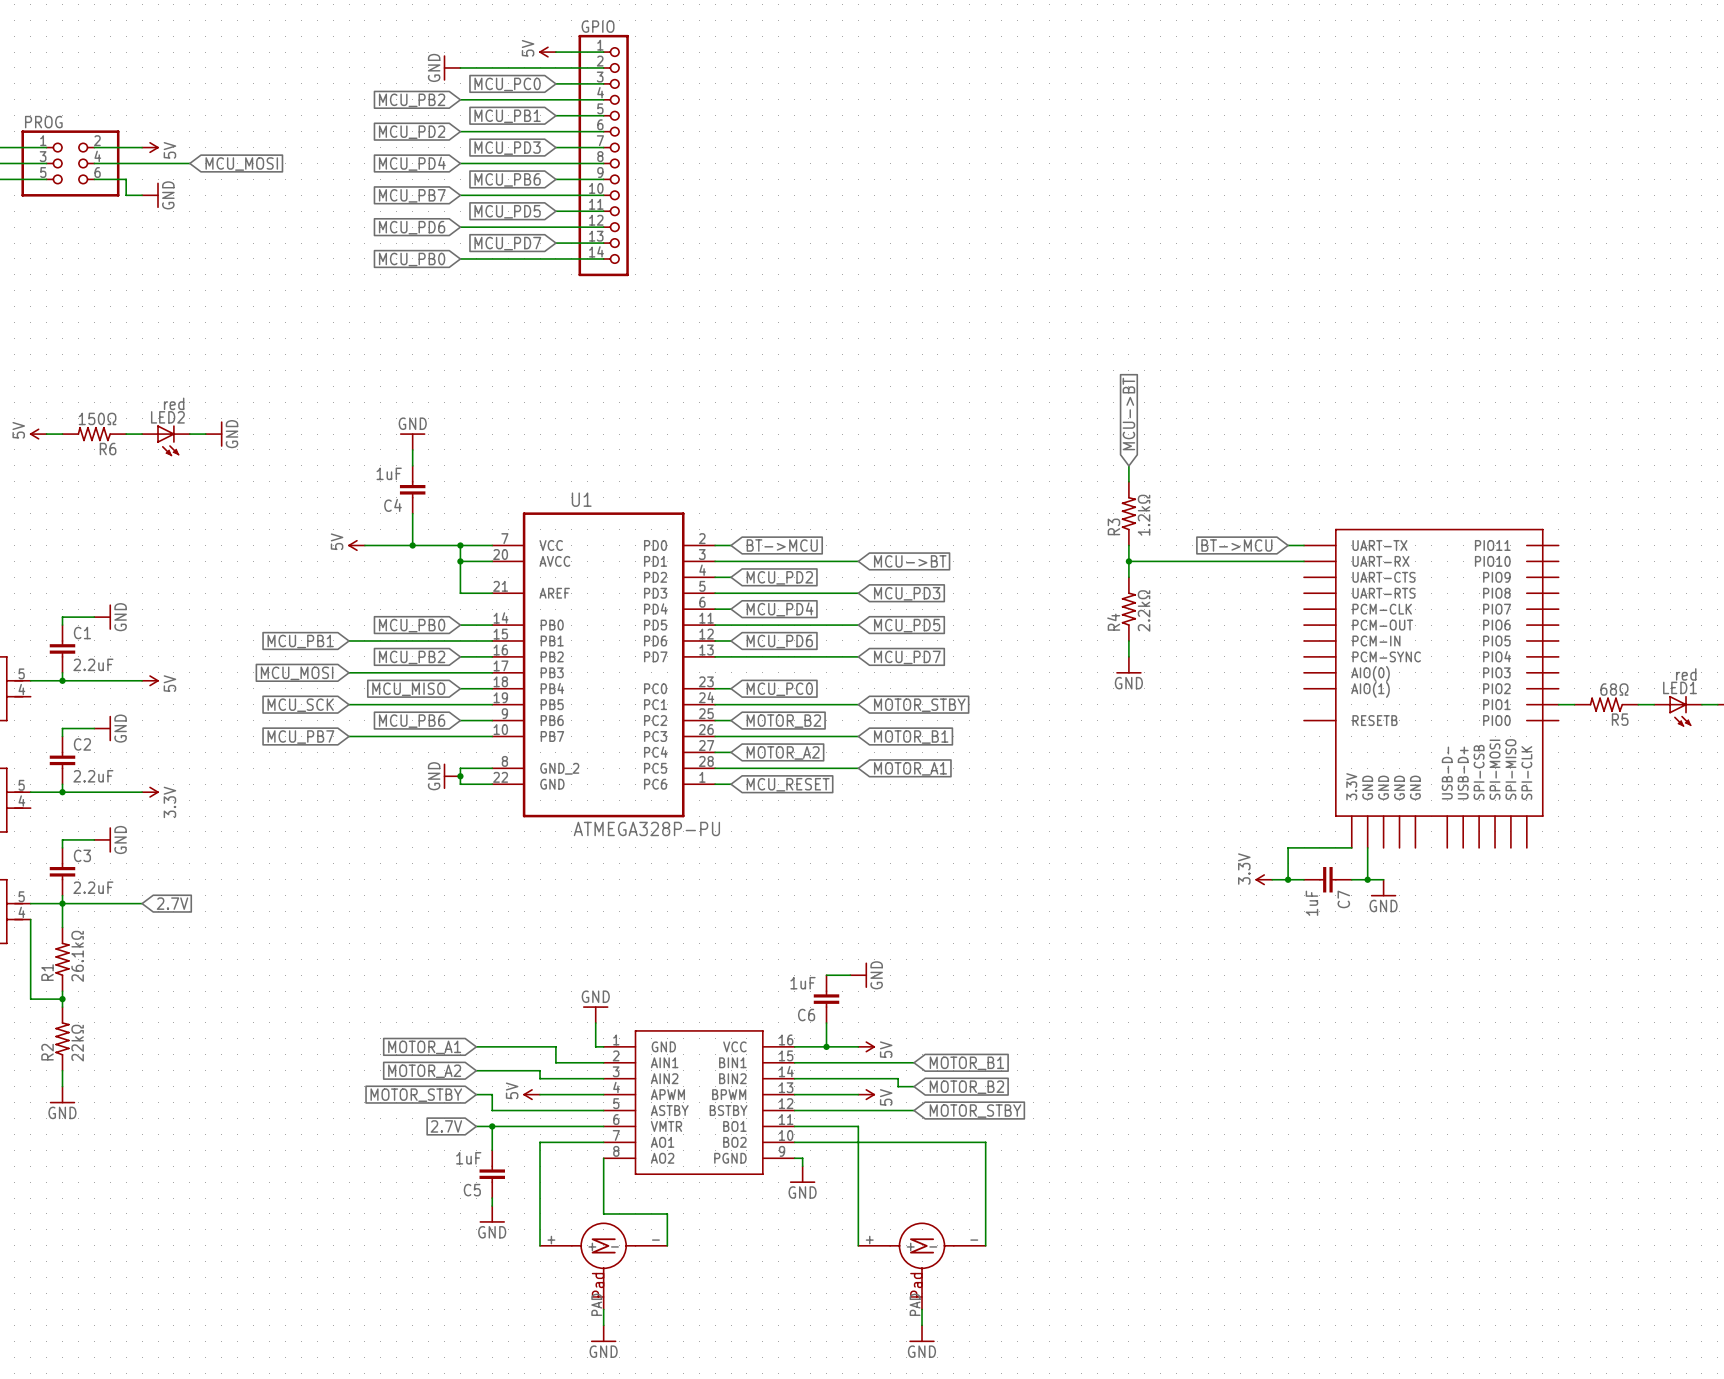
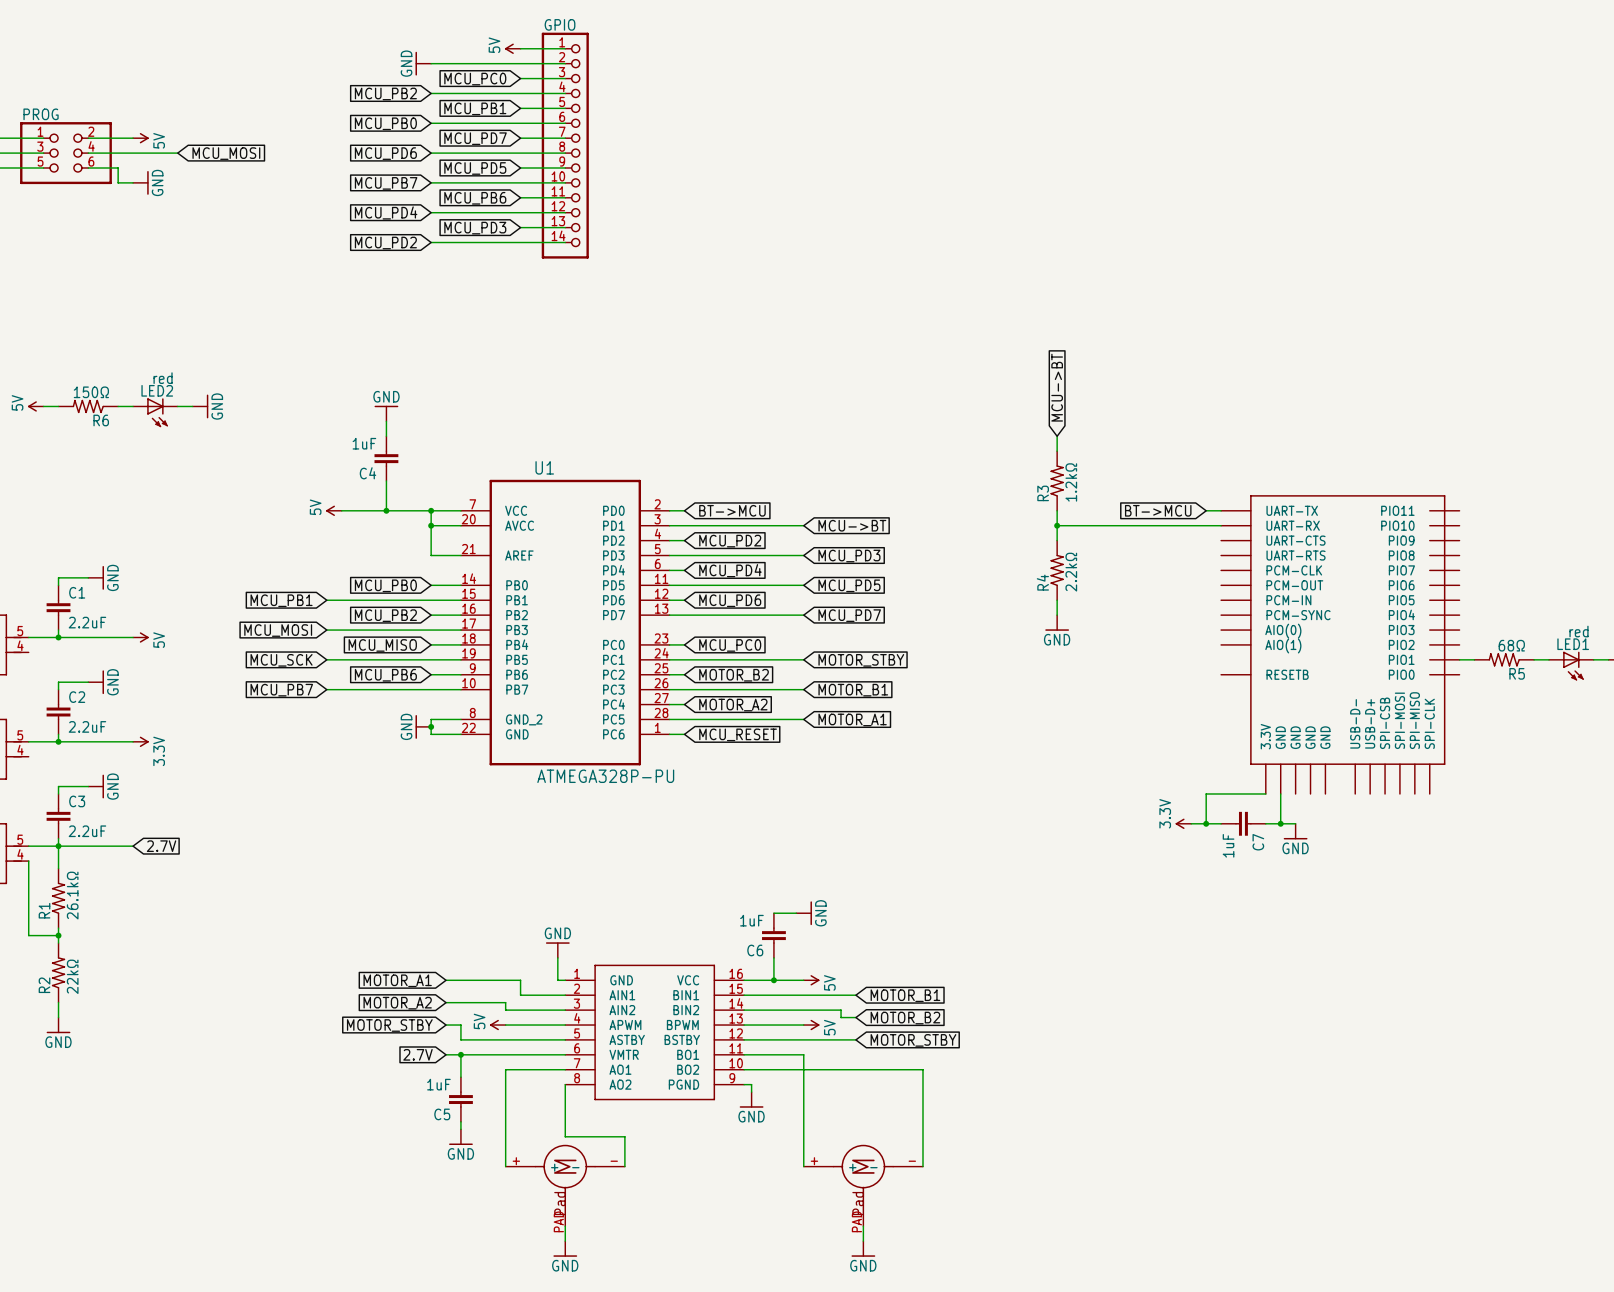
global label: MCU_PD2 (412, 132) -> MCU_PB0 (385, 123)
global label: MCU_PD3 (507, 148) -> MCU_PD7 (475, 138)
global label: MCU_PD4 (412, 163) -> MCU_PD6 (385, 153)
global label: MCU_PB6 (507, 179) -> MCU_PD5 (475, 168)
global label: MCU_PD5 (507, 211) -> MCU_PB6 (475, 198)
global label: MCU_PD6 (412, 227) -> MCU_PD4 (386, 212)
global label: MCU_PD7 (507, 243) -> MCU_PD3 (475, 228)
global label: MCU_PB0 (412, 259) -> MCU_PD2 (385, 243)

